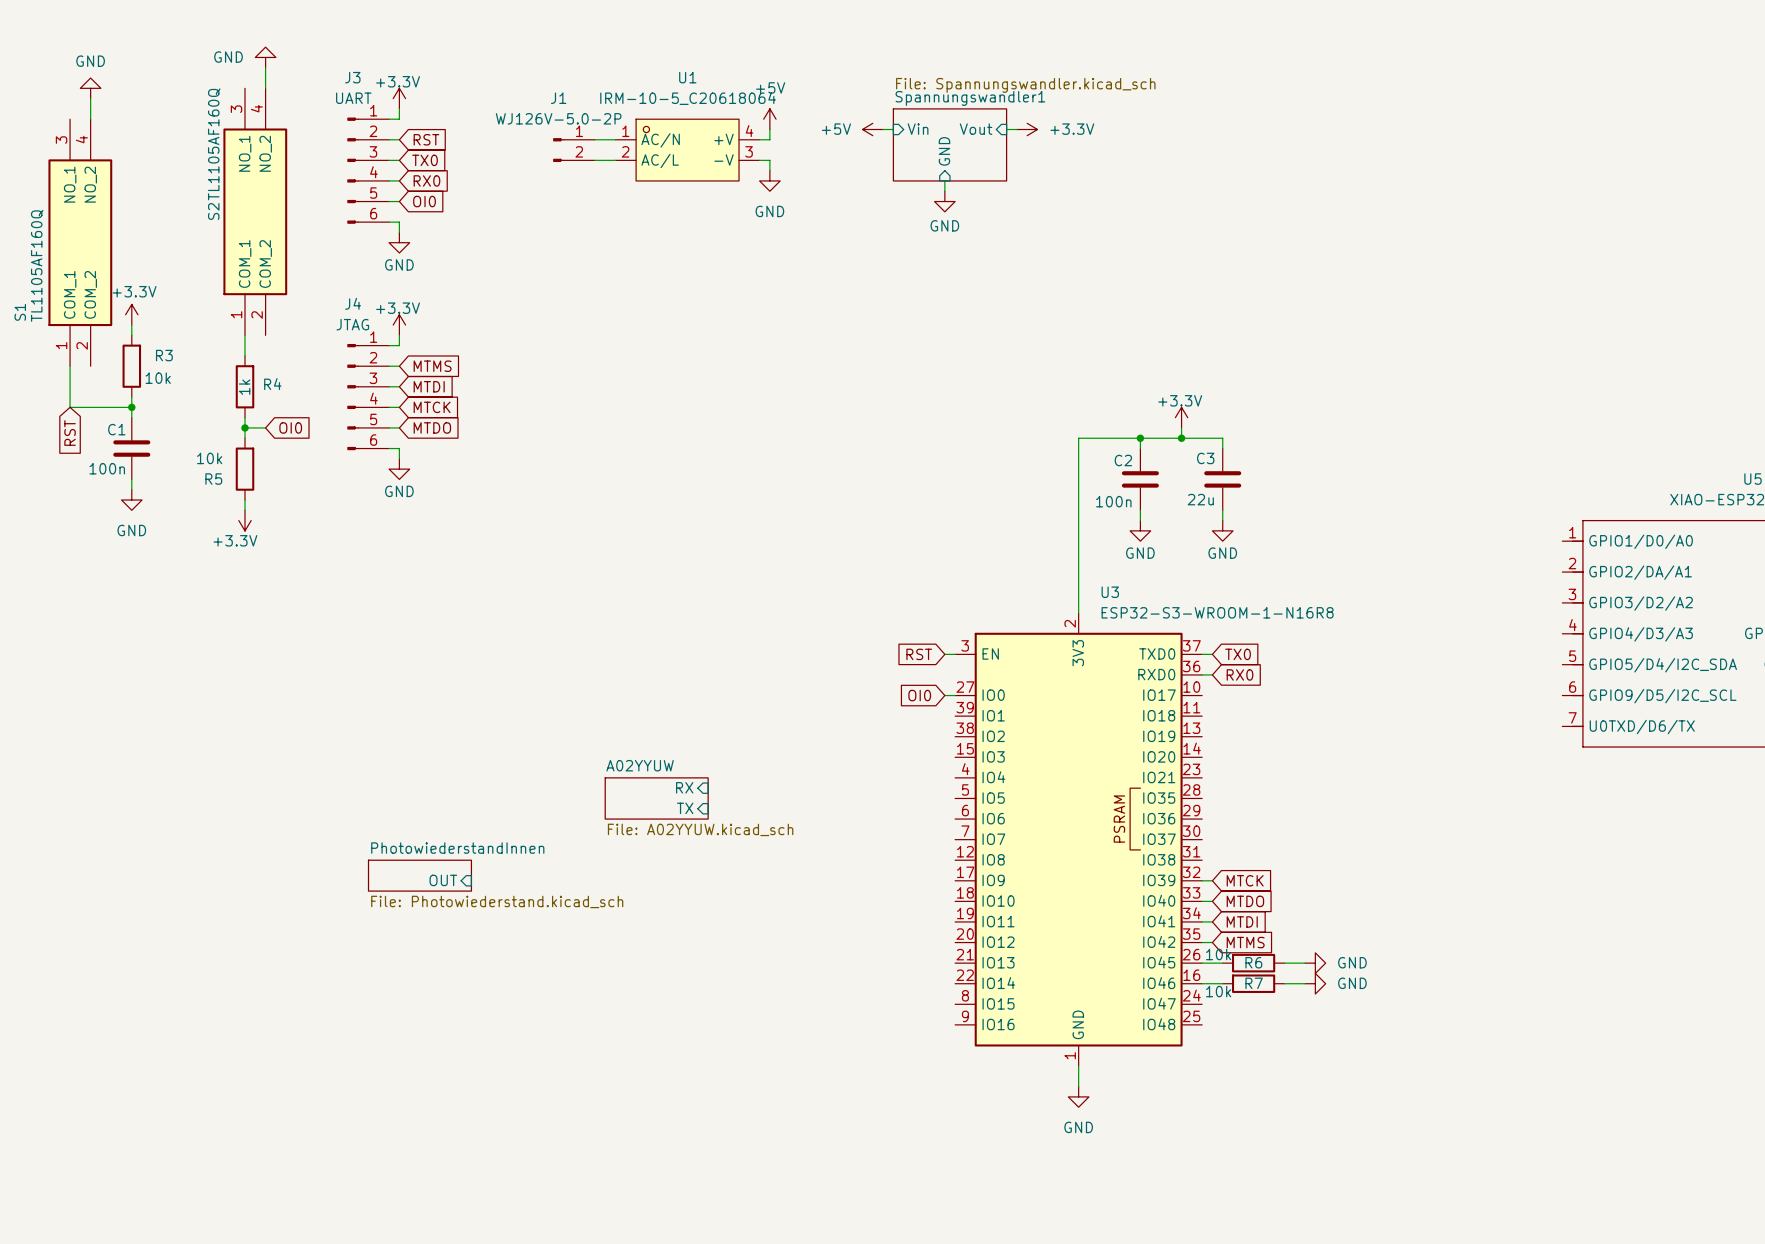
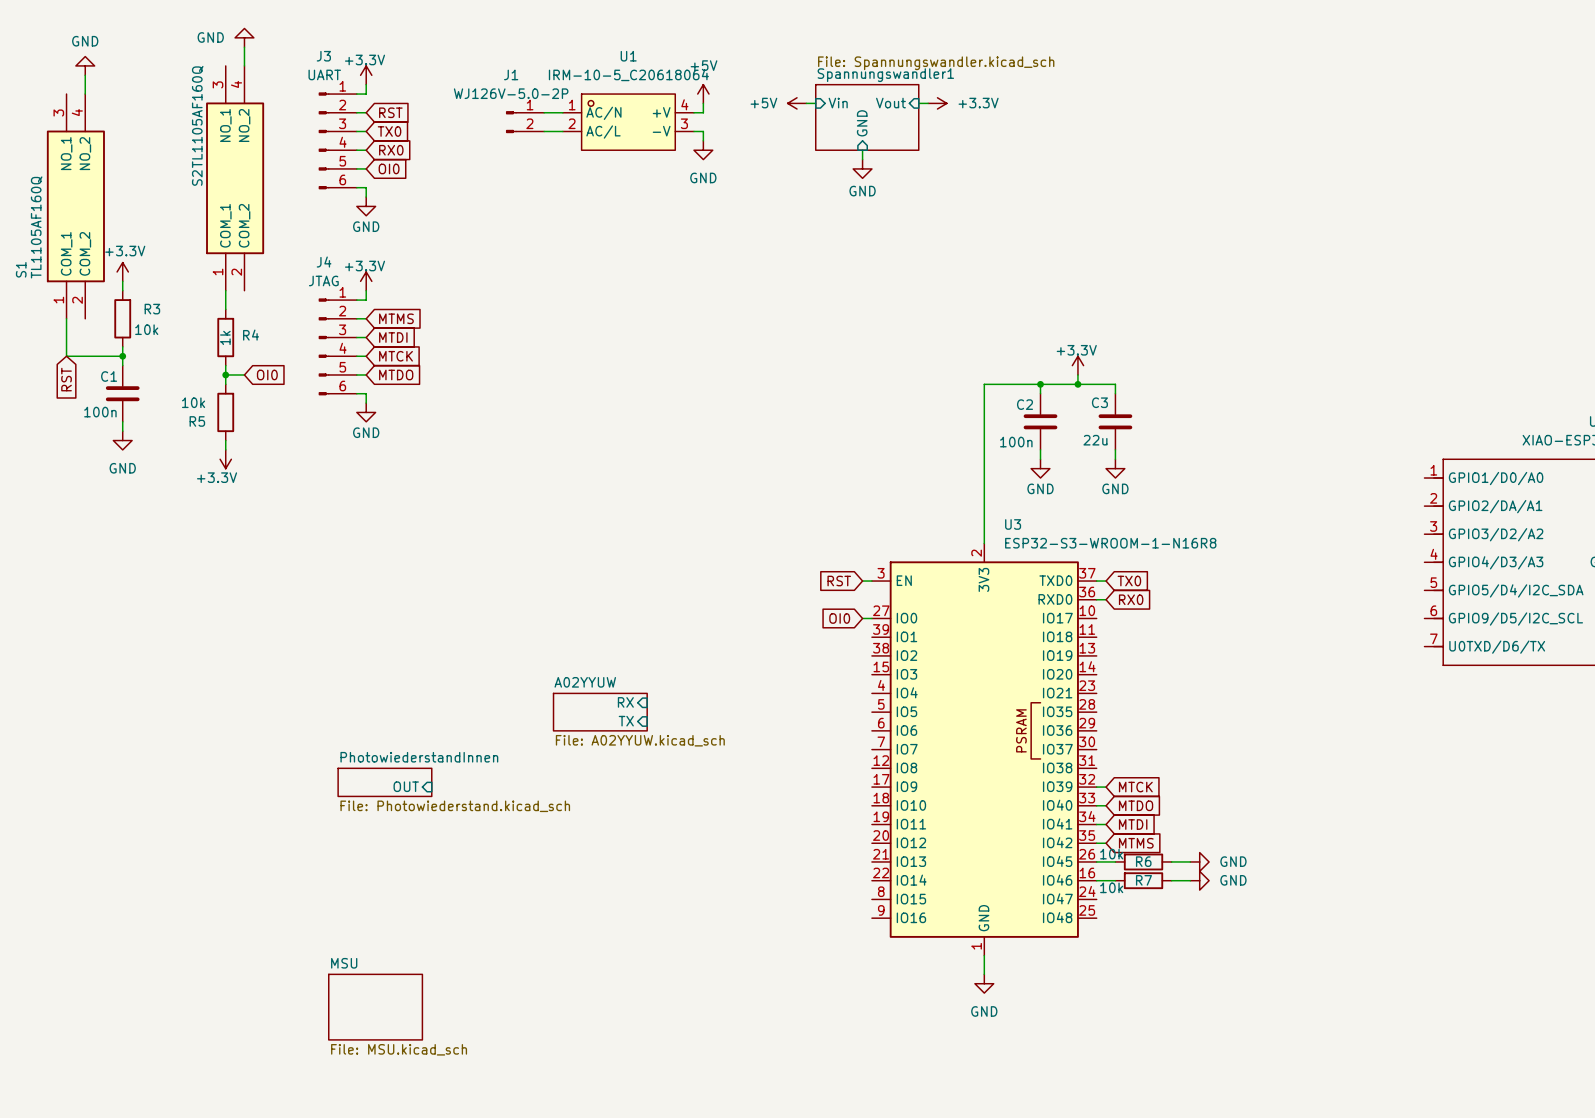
sheet MSU: none -> File: MSU.kicad_sch (375, 1007)

